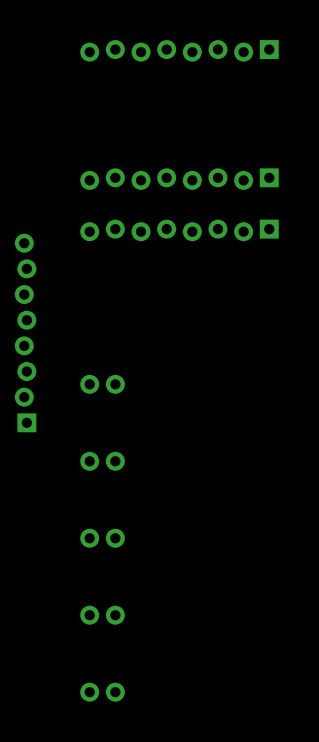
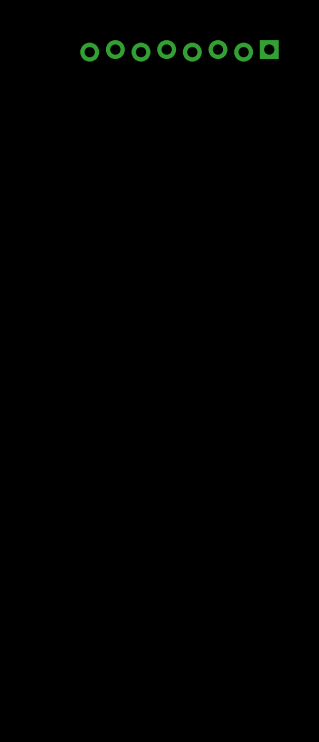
part: (179, 179) -> none
part: (179, 230) -> none
part: (25, 333) -> none
part: (102, 384) -> none
part: (102, 461) -> none
part: (102, 538) -> none
part: (102, 615) -> none
part: (102, 692) -> none

